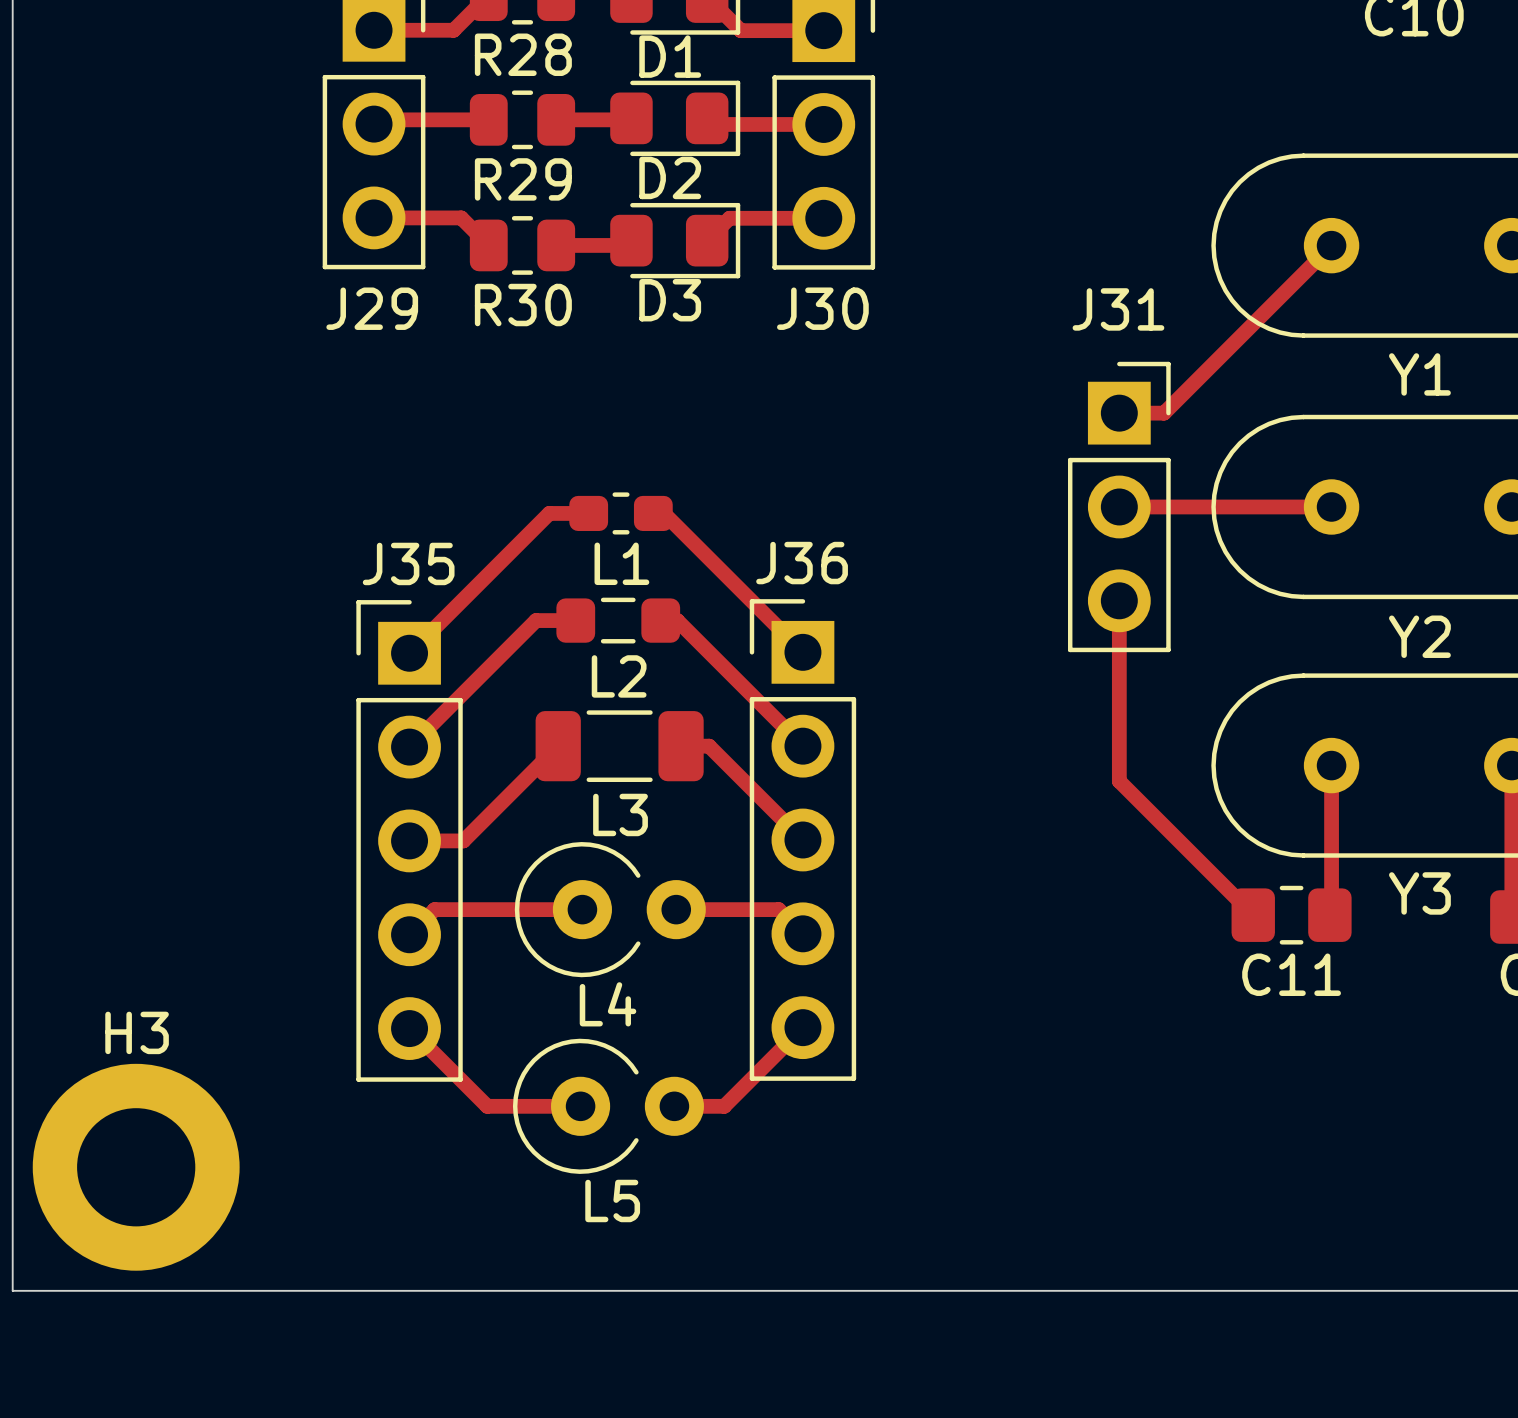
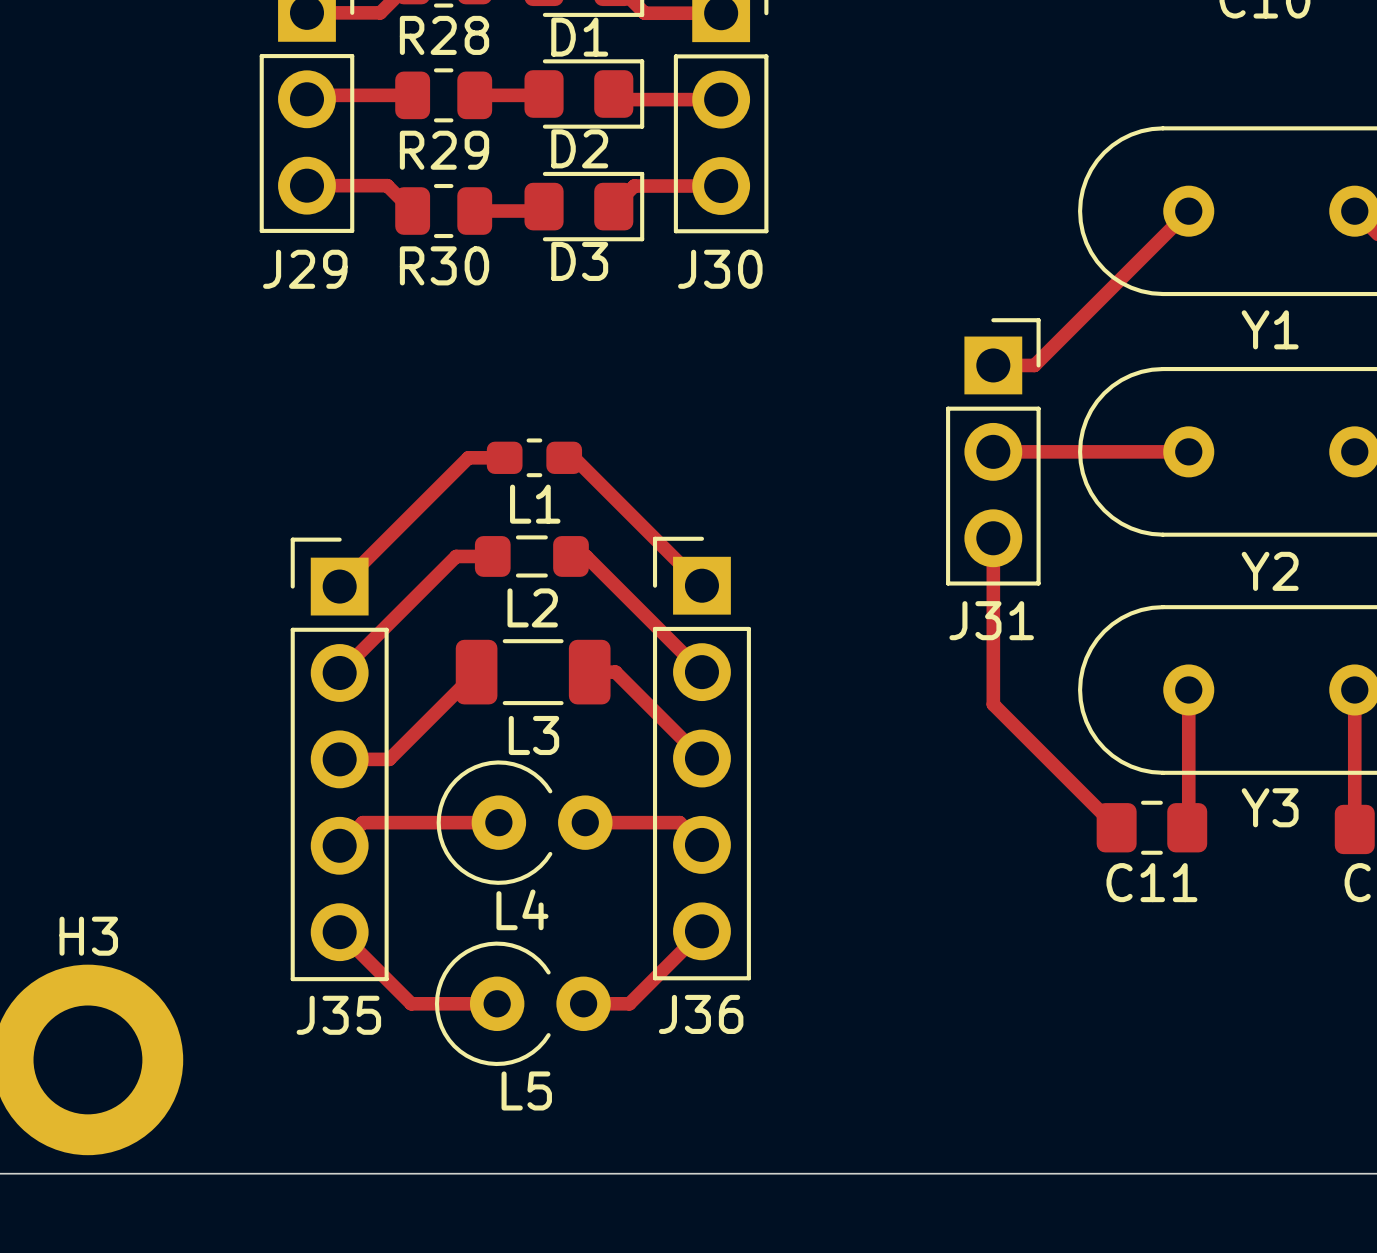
J31 name position: J31 (1118, 309) -> J31 (991, 620)
J35 name position: J35 (408, 563) -> J35 (338, 1015)
J36 name position: J36 (802, 563) -> J36 (701, 1014)

